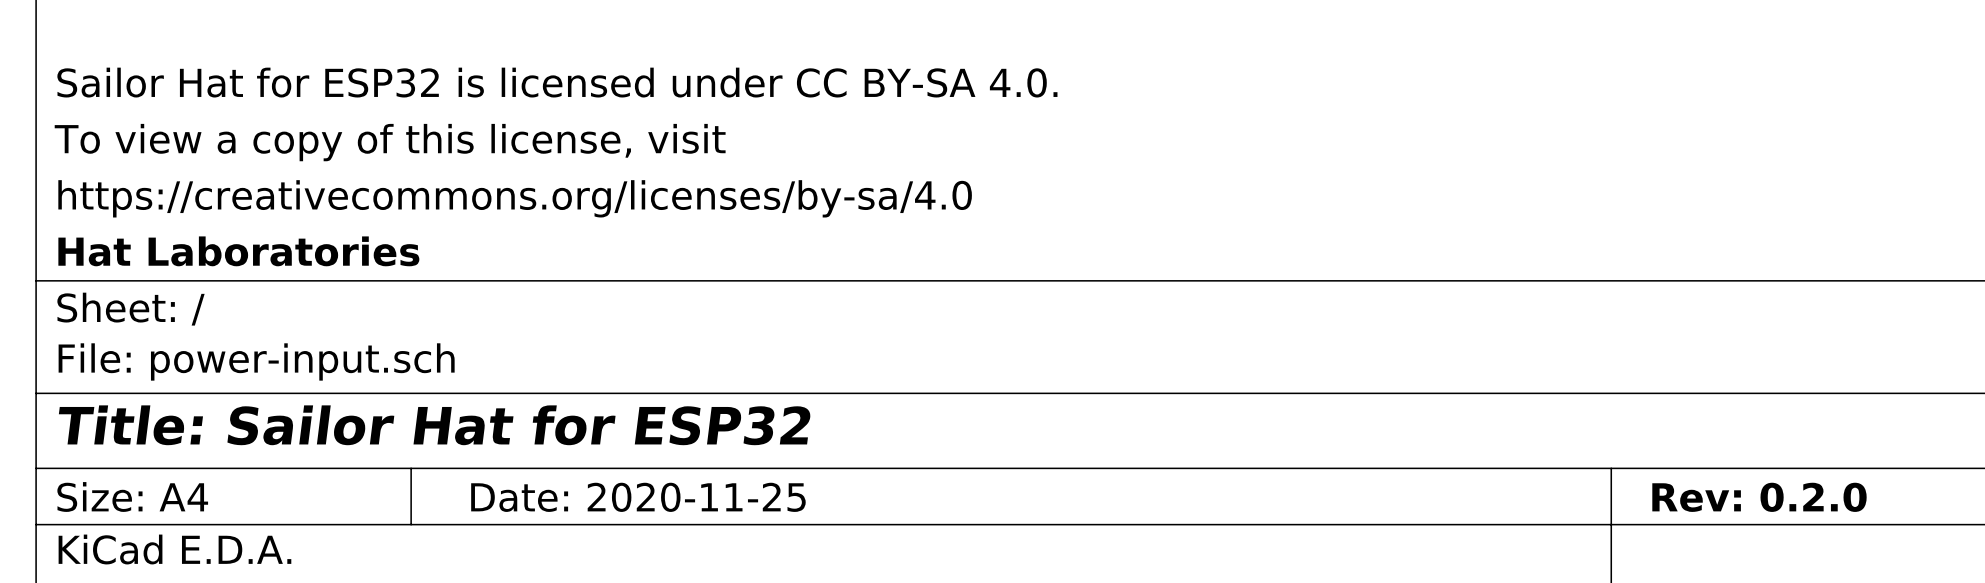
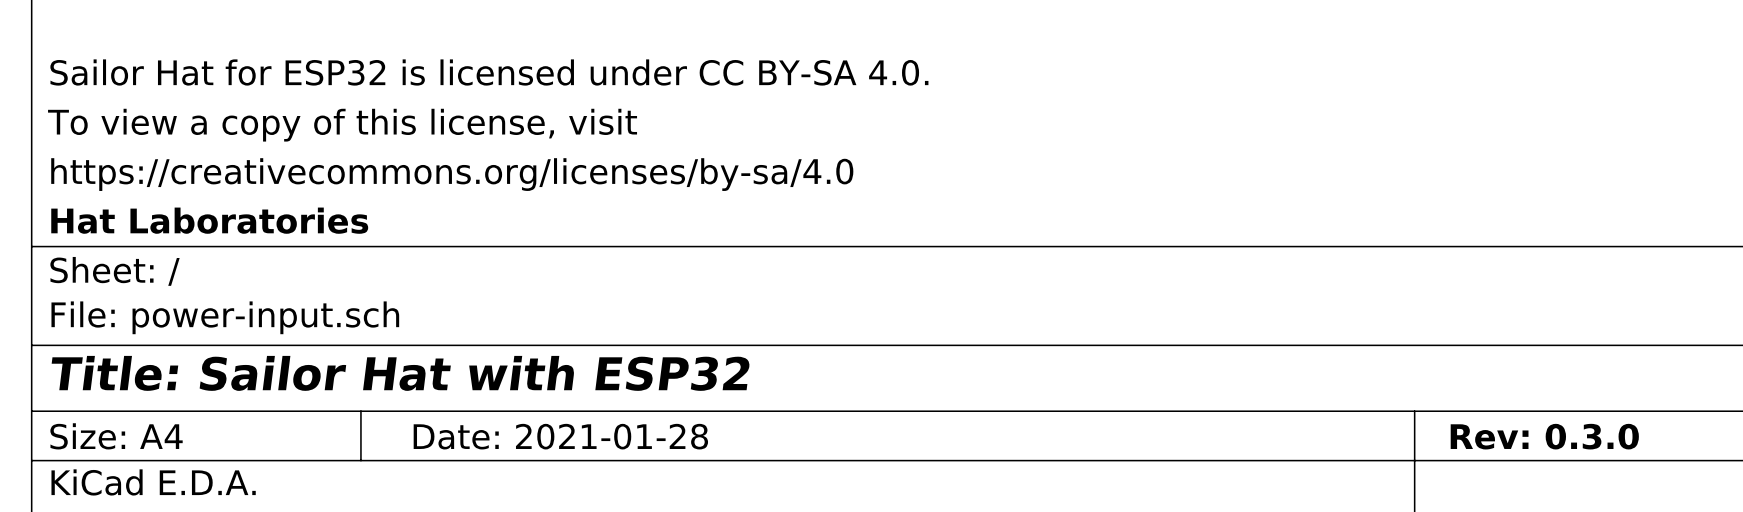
title block: Title: Sailor Hat for ESP32 (434, 425) -> Title: Sailor Hat with ESP32 (400, 373)
title block: Date: 2020-11-25 (638, 497) -> Date: 2021-01-28 (560, 436)
title block: Rev: 0.2.0 (1759, 497) -> Rev: 0.3.0 (1544, 436)

